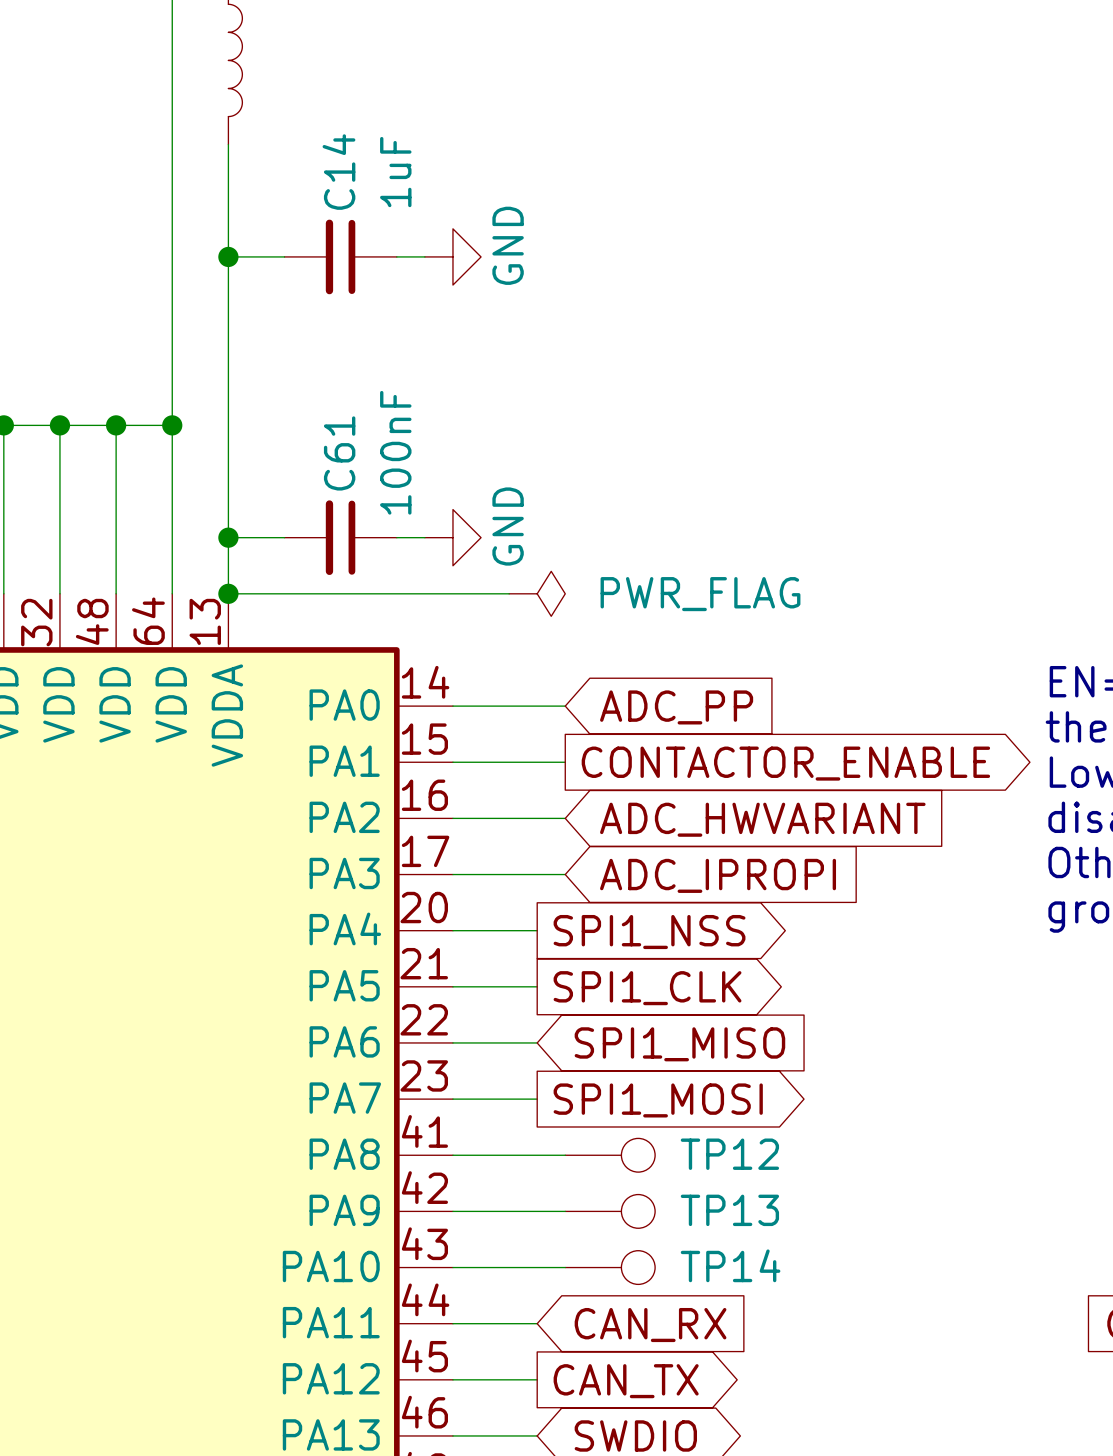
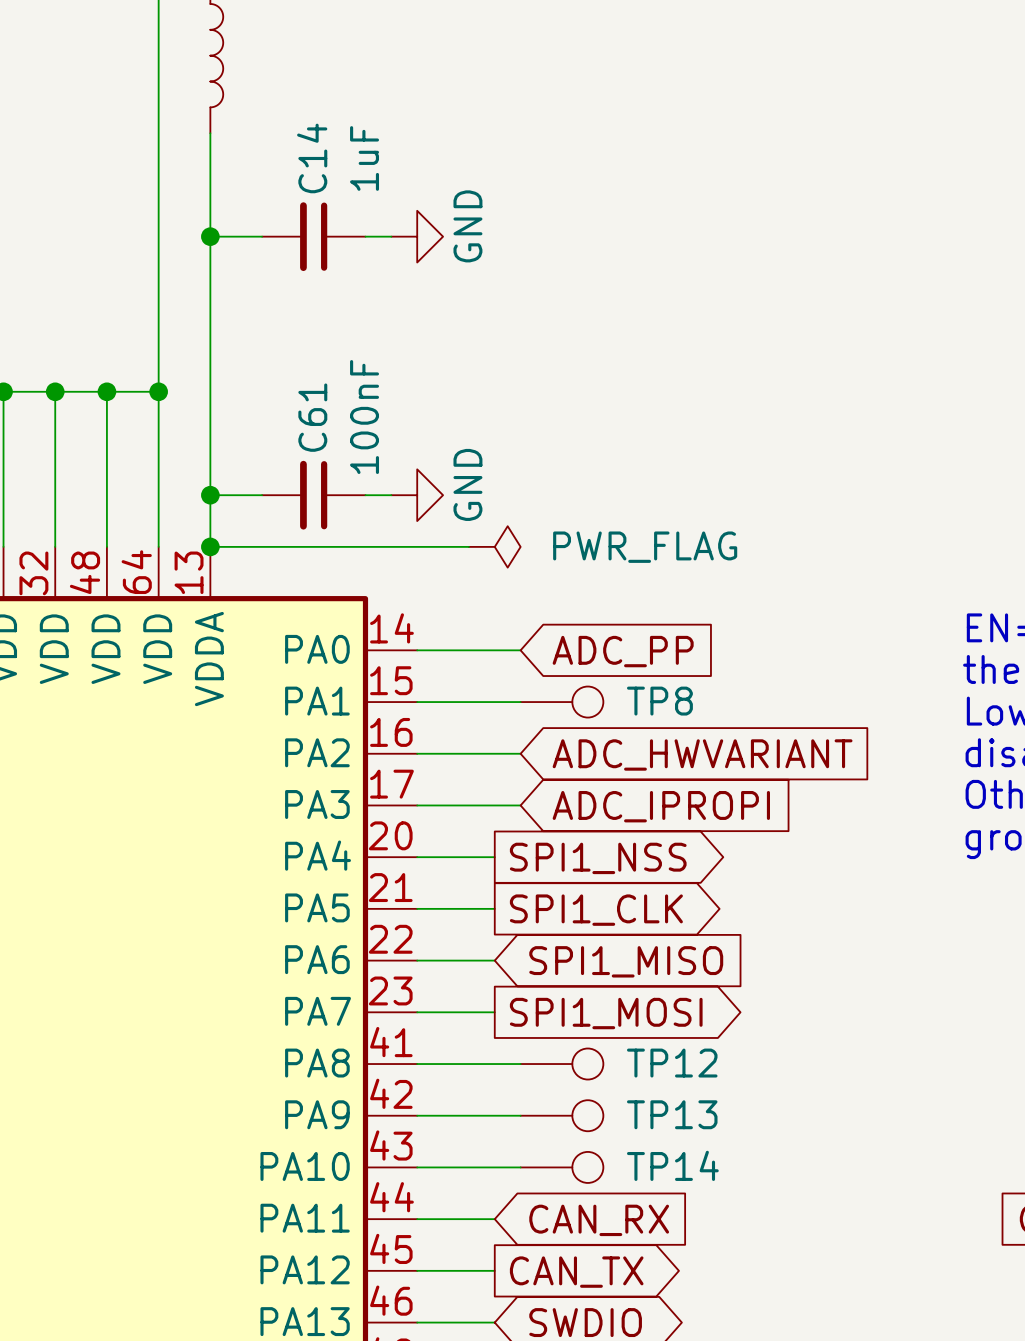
TP8: none -> (561, 702)
global label: CONTACTOR_ENABLE (785, 763) -> none

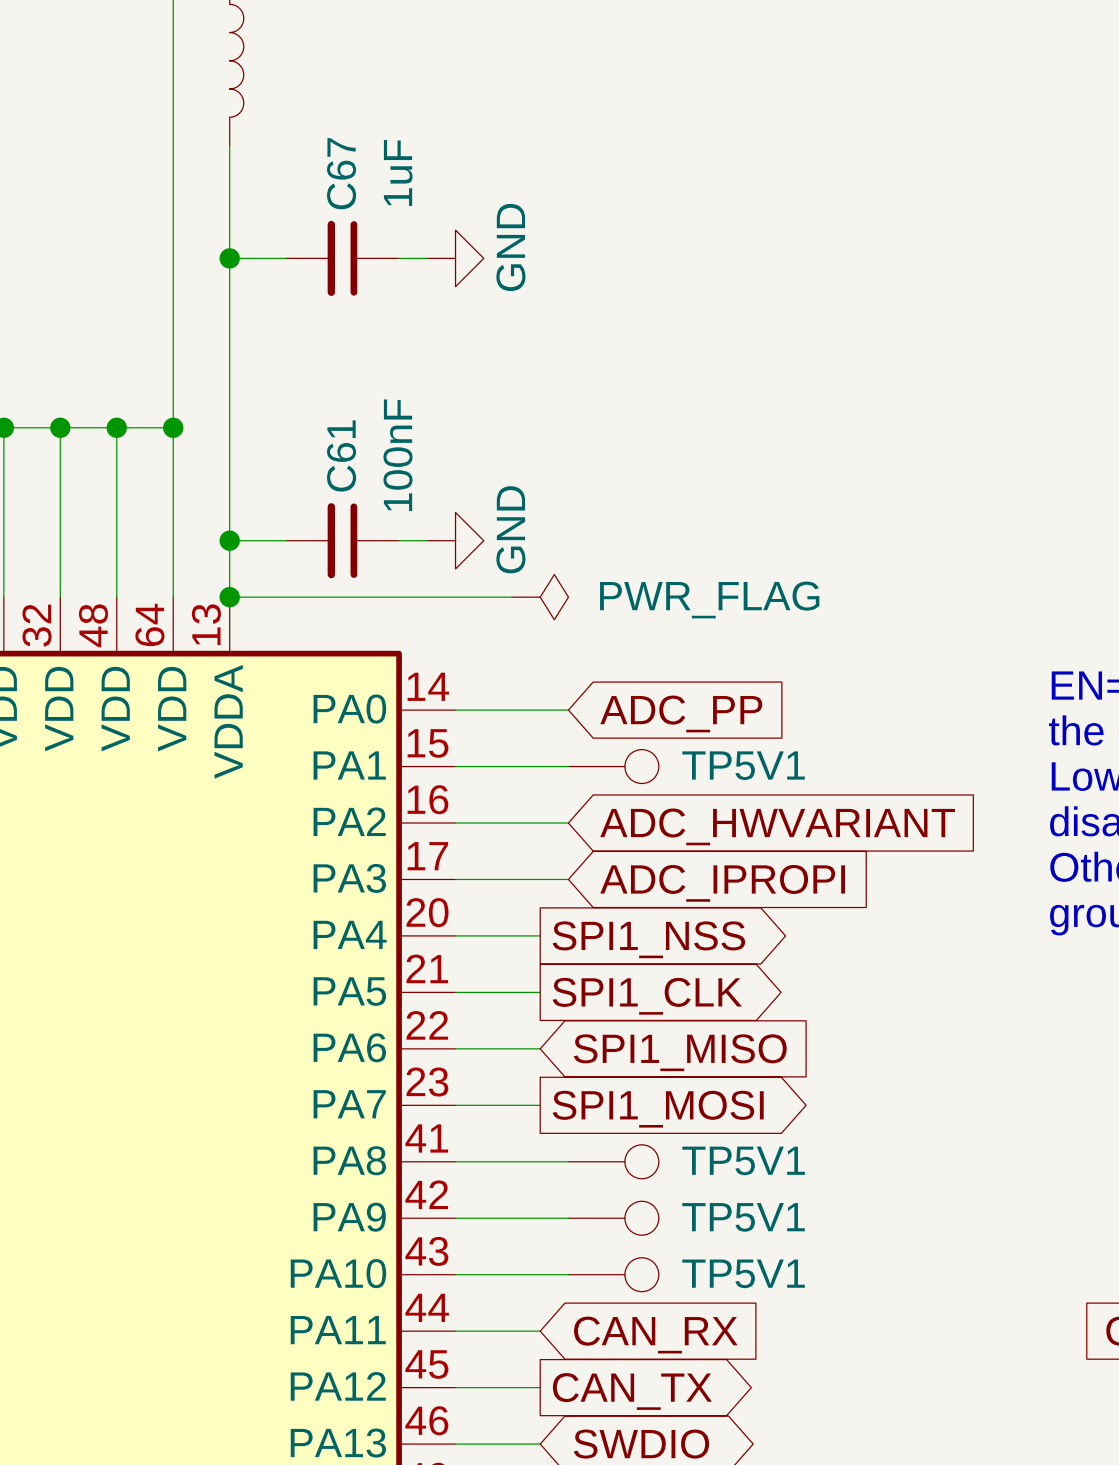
C14 name: C14 (312, 158) -> C67 (341, 173)
TP8 name: TP8 (659, 701) -> TP5V1 (743, 765)
TP12 name: TP12 (672, 1063) -> TP5V1 (743, 1160)
TP13 name: TP13 (672, 1114) -> TP5V1 (743, 1217)
TP14 name: TP14 (672, 1165) -> TP5V1 (743, 1273)

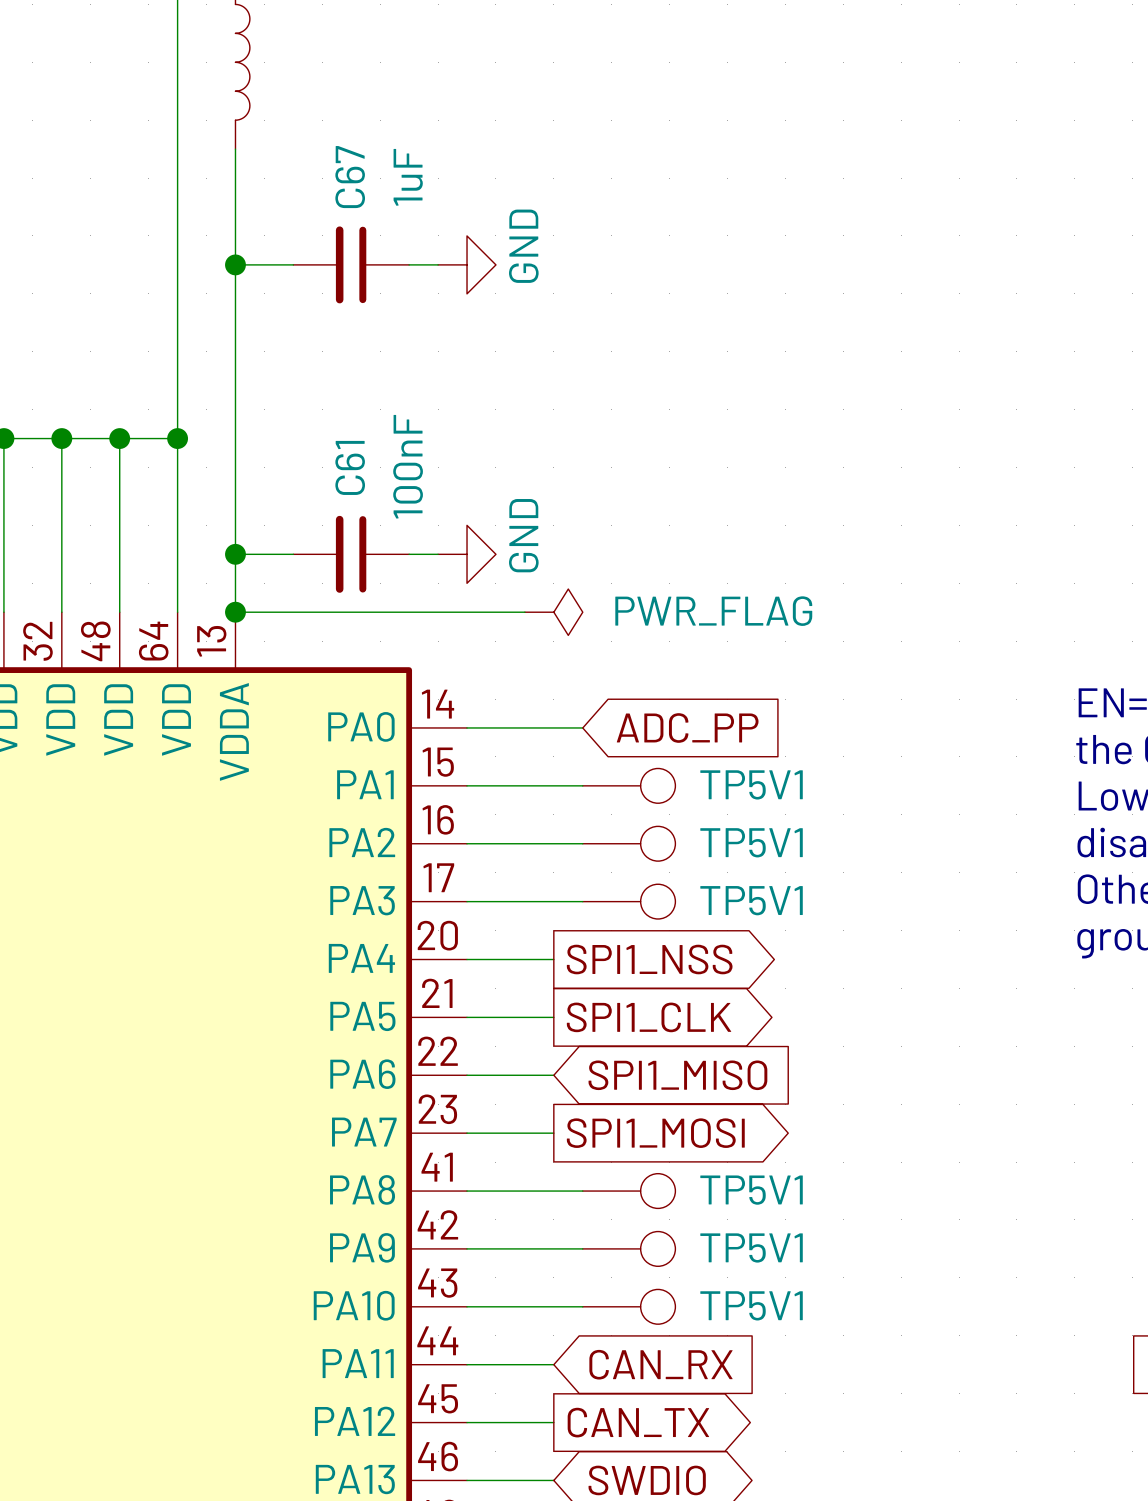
TP5V1: none -> (629, 843)
global label: ADC_HWVARIANT (777, 826) -> none
TP5V1: none -> (629, 901)
global label: ADC_IPROPI (722, 883) -> none

